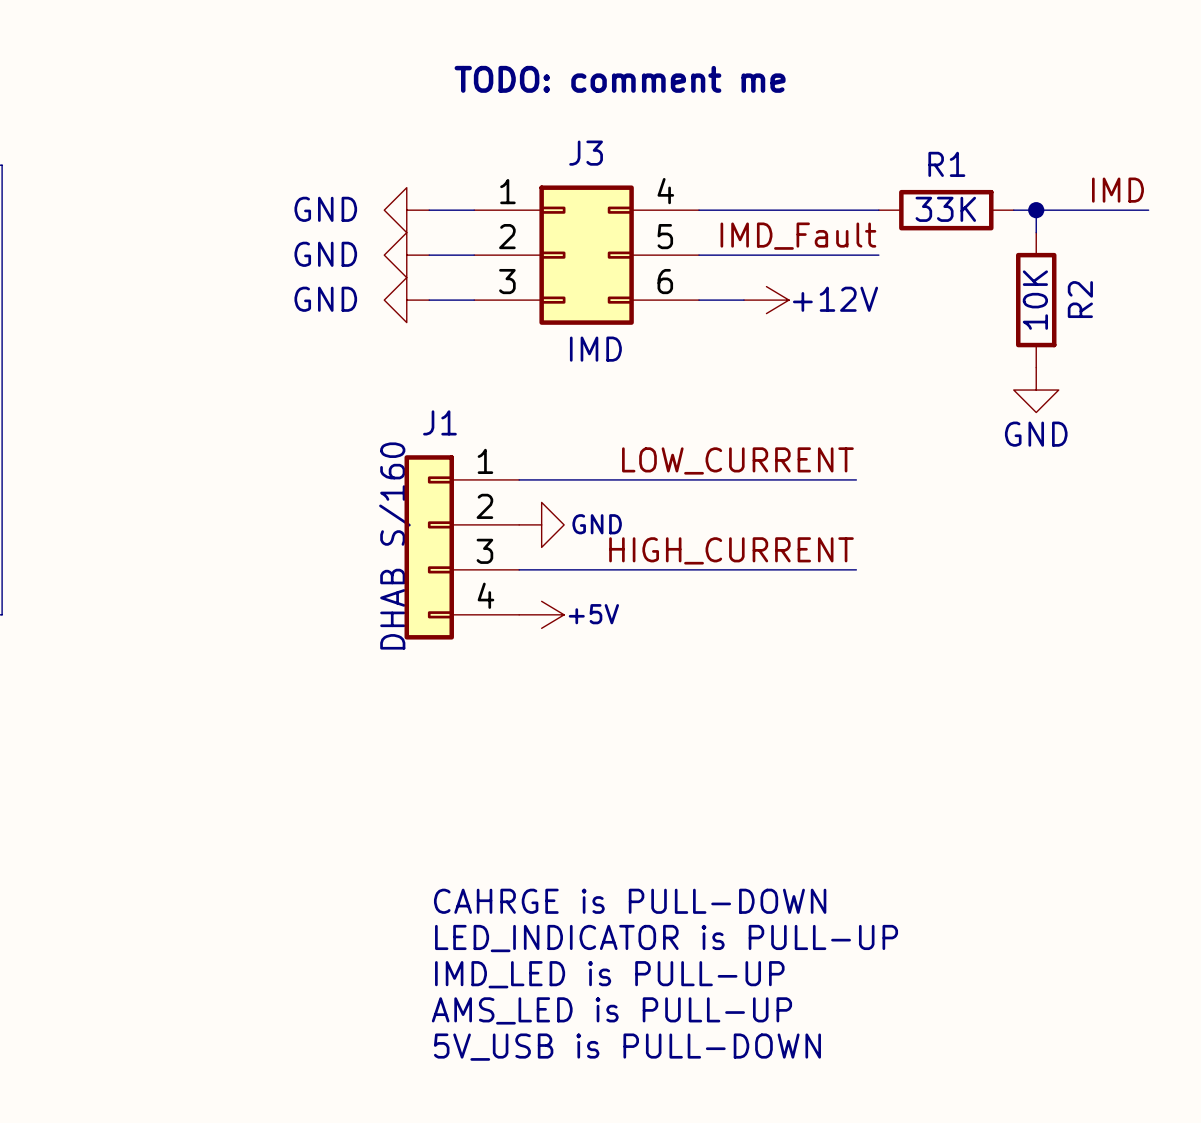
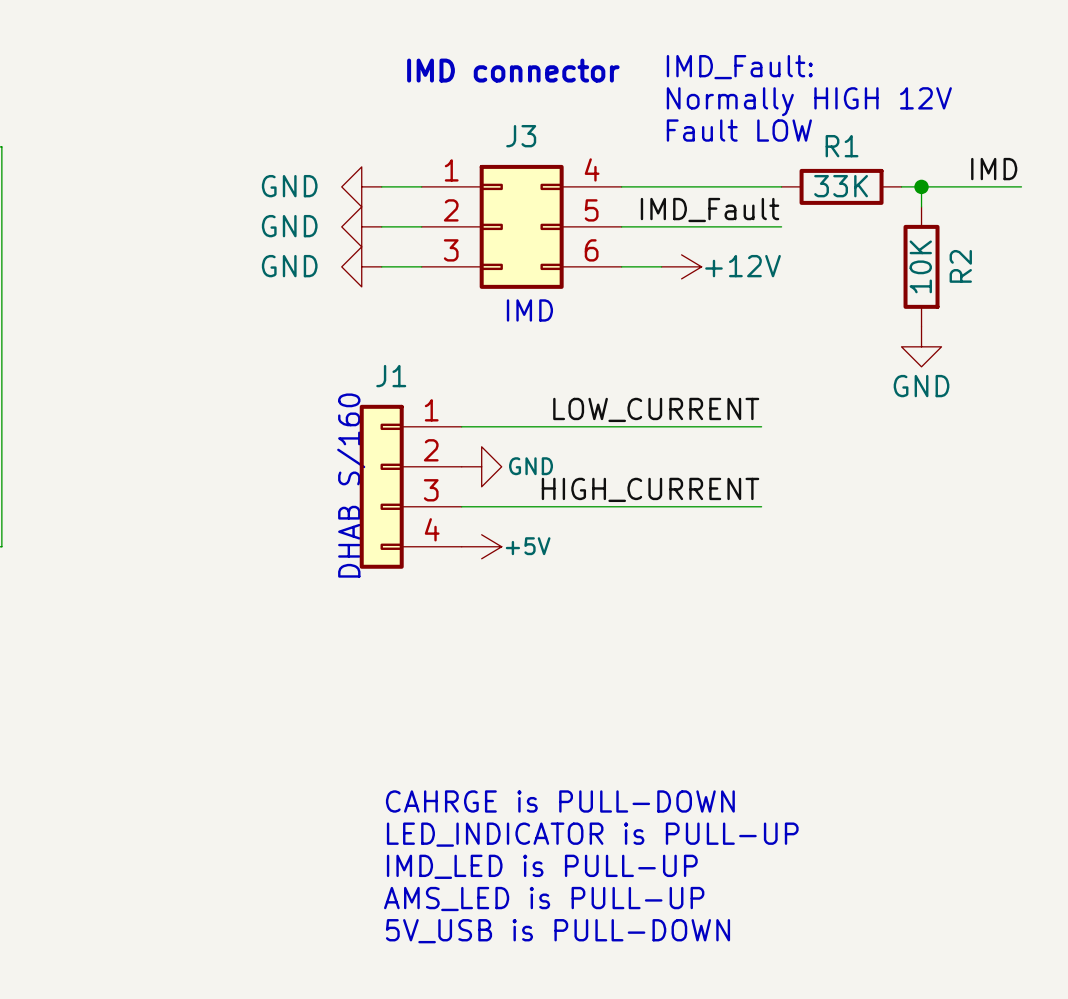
text: none -> IMD_Fault: (739, 67)
text: TODO: comment me (620, 79) -> IMD connector (513, 70)
text: none -> Normally HIGH 12V (809, 101)
text: none -> Fault LOW (739, 130)

